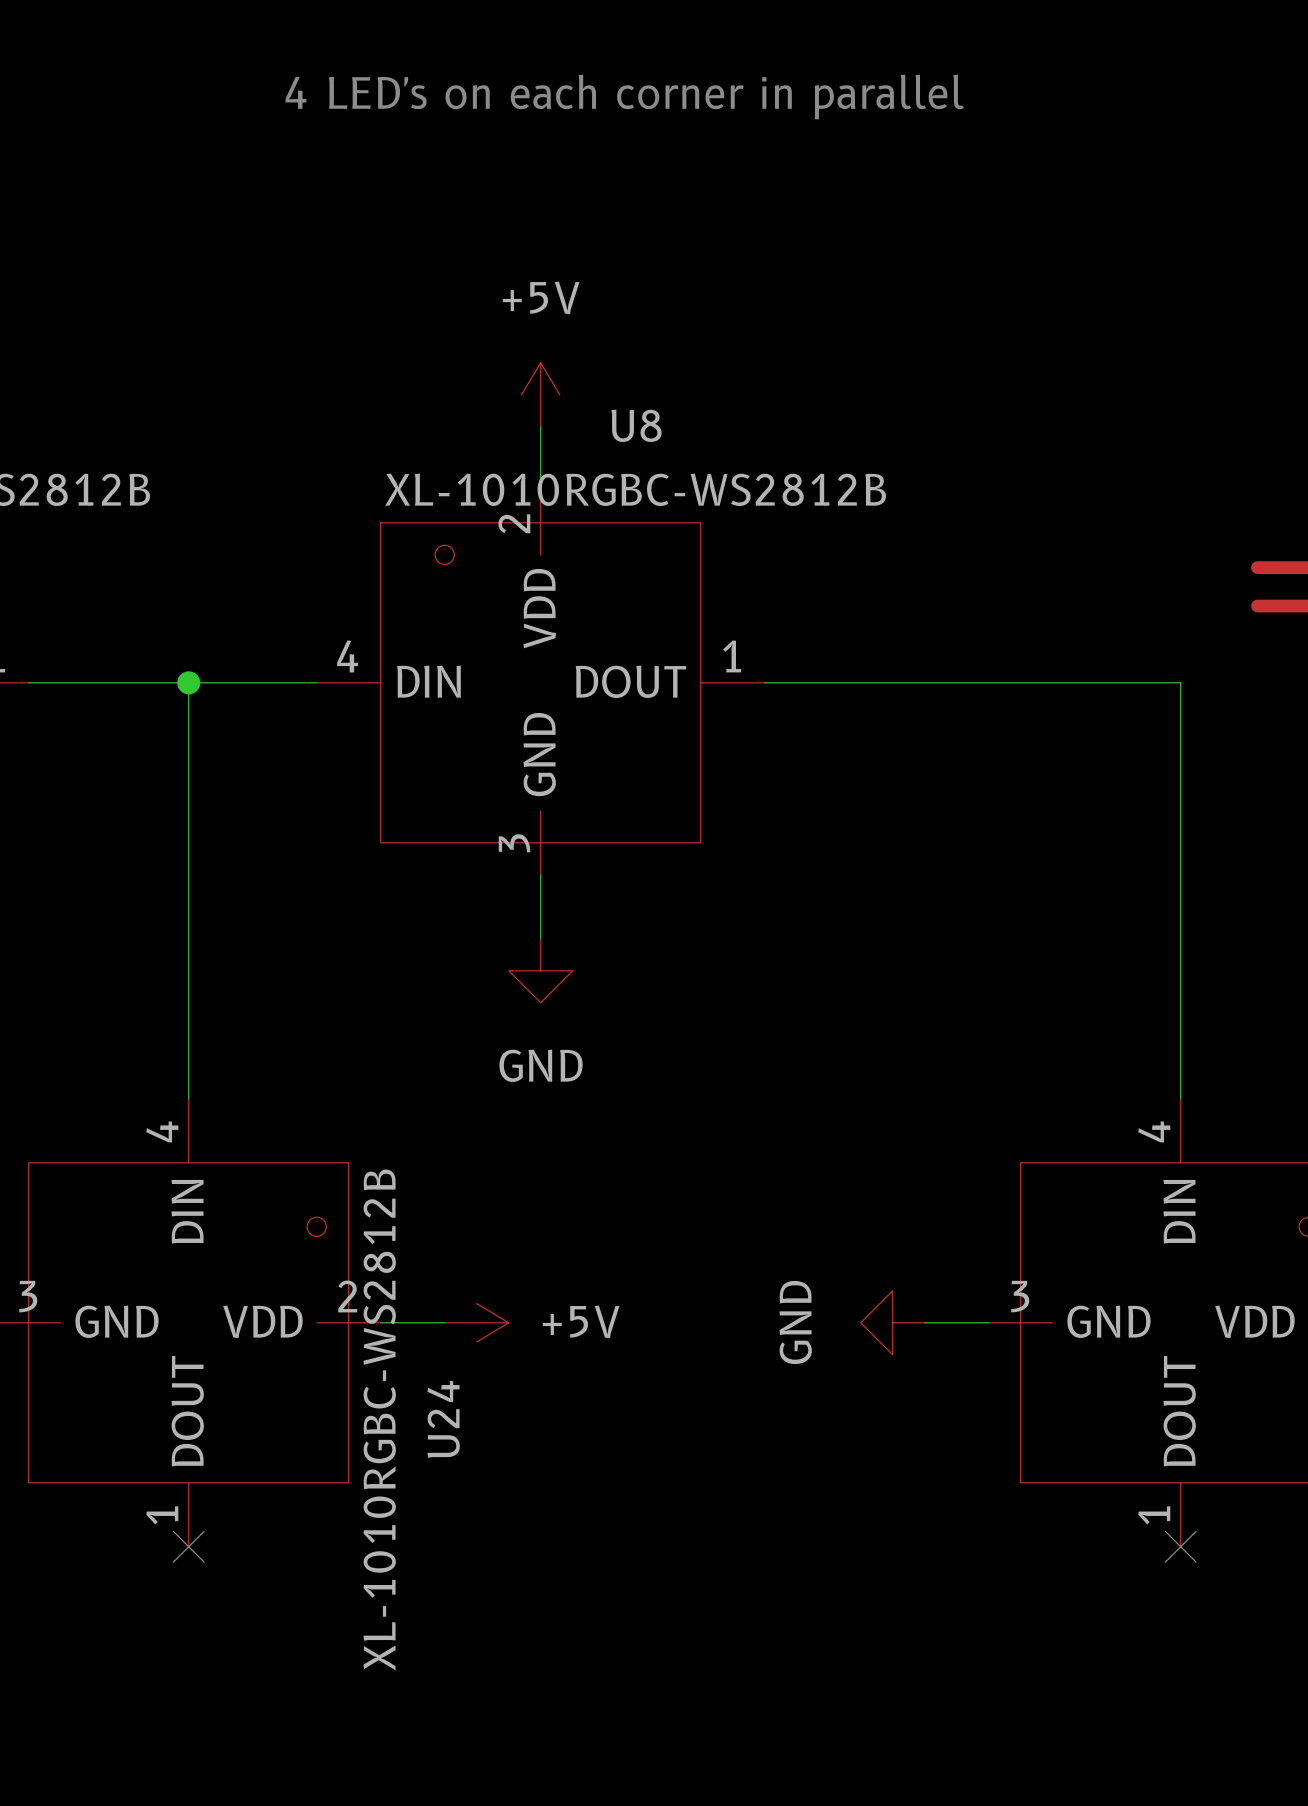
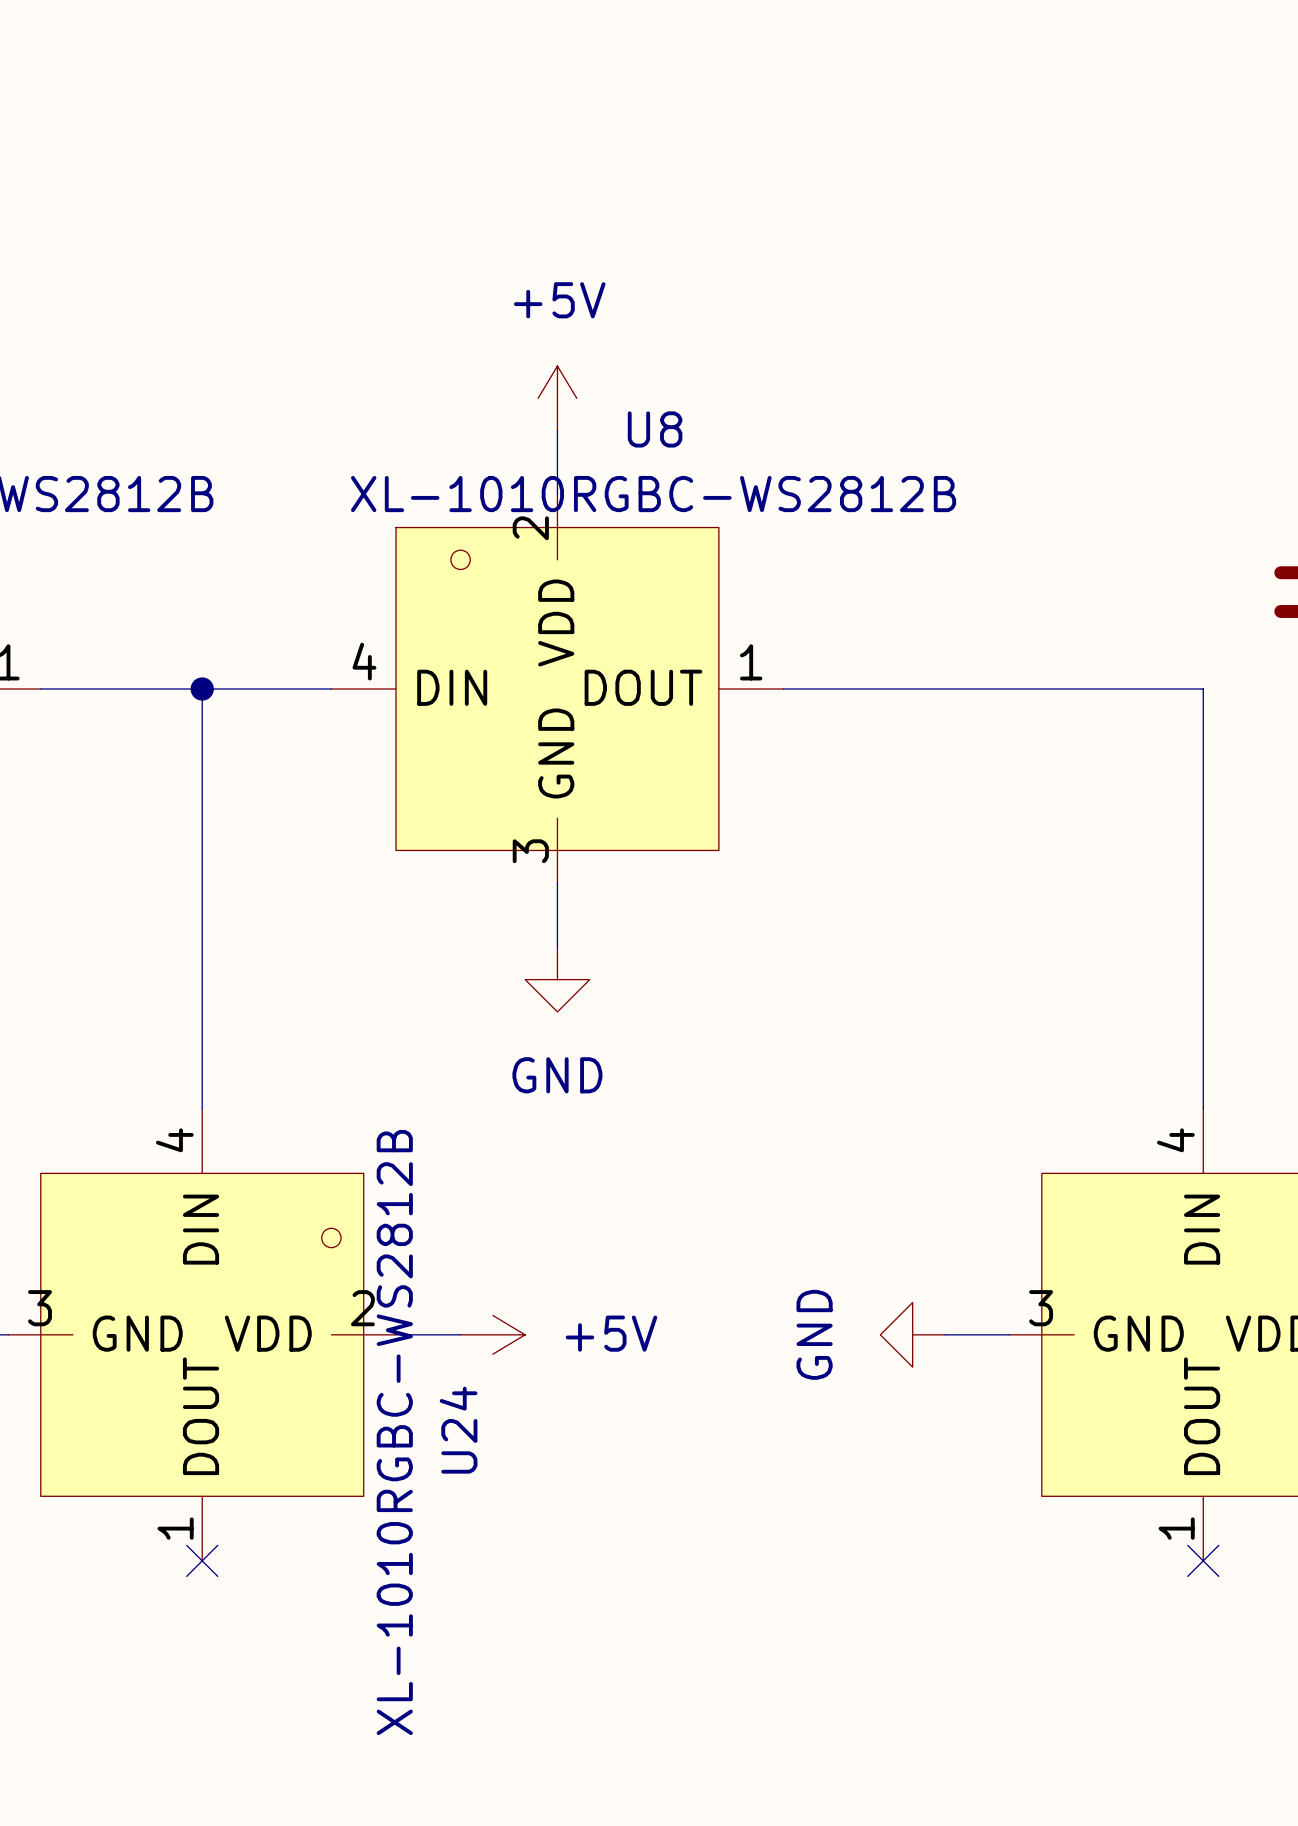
text: 4 LED's on each corner in parallel (624, 97) -> none

